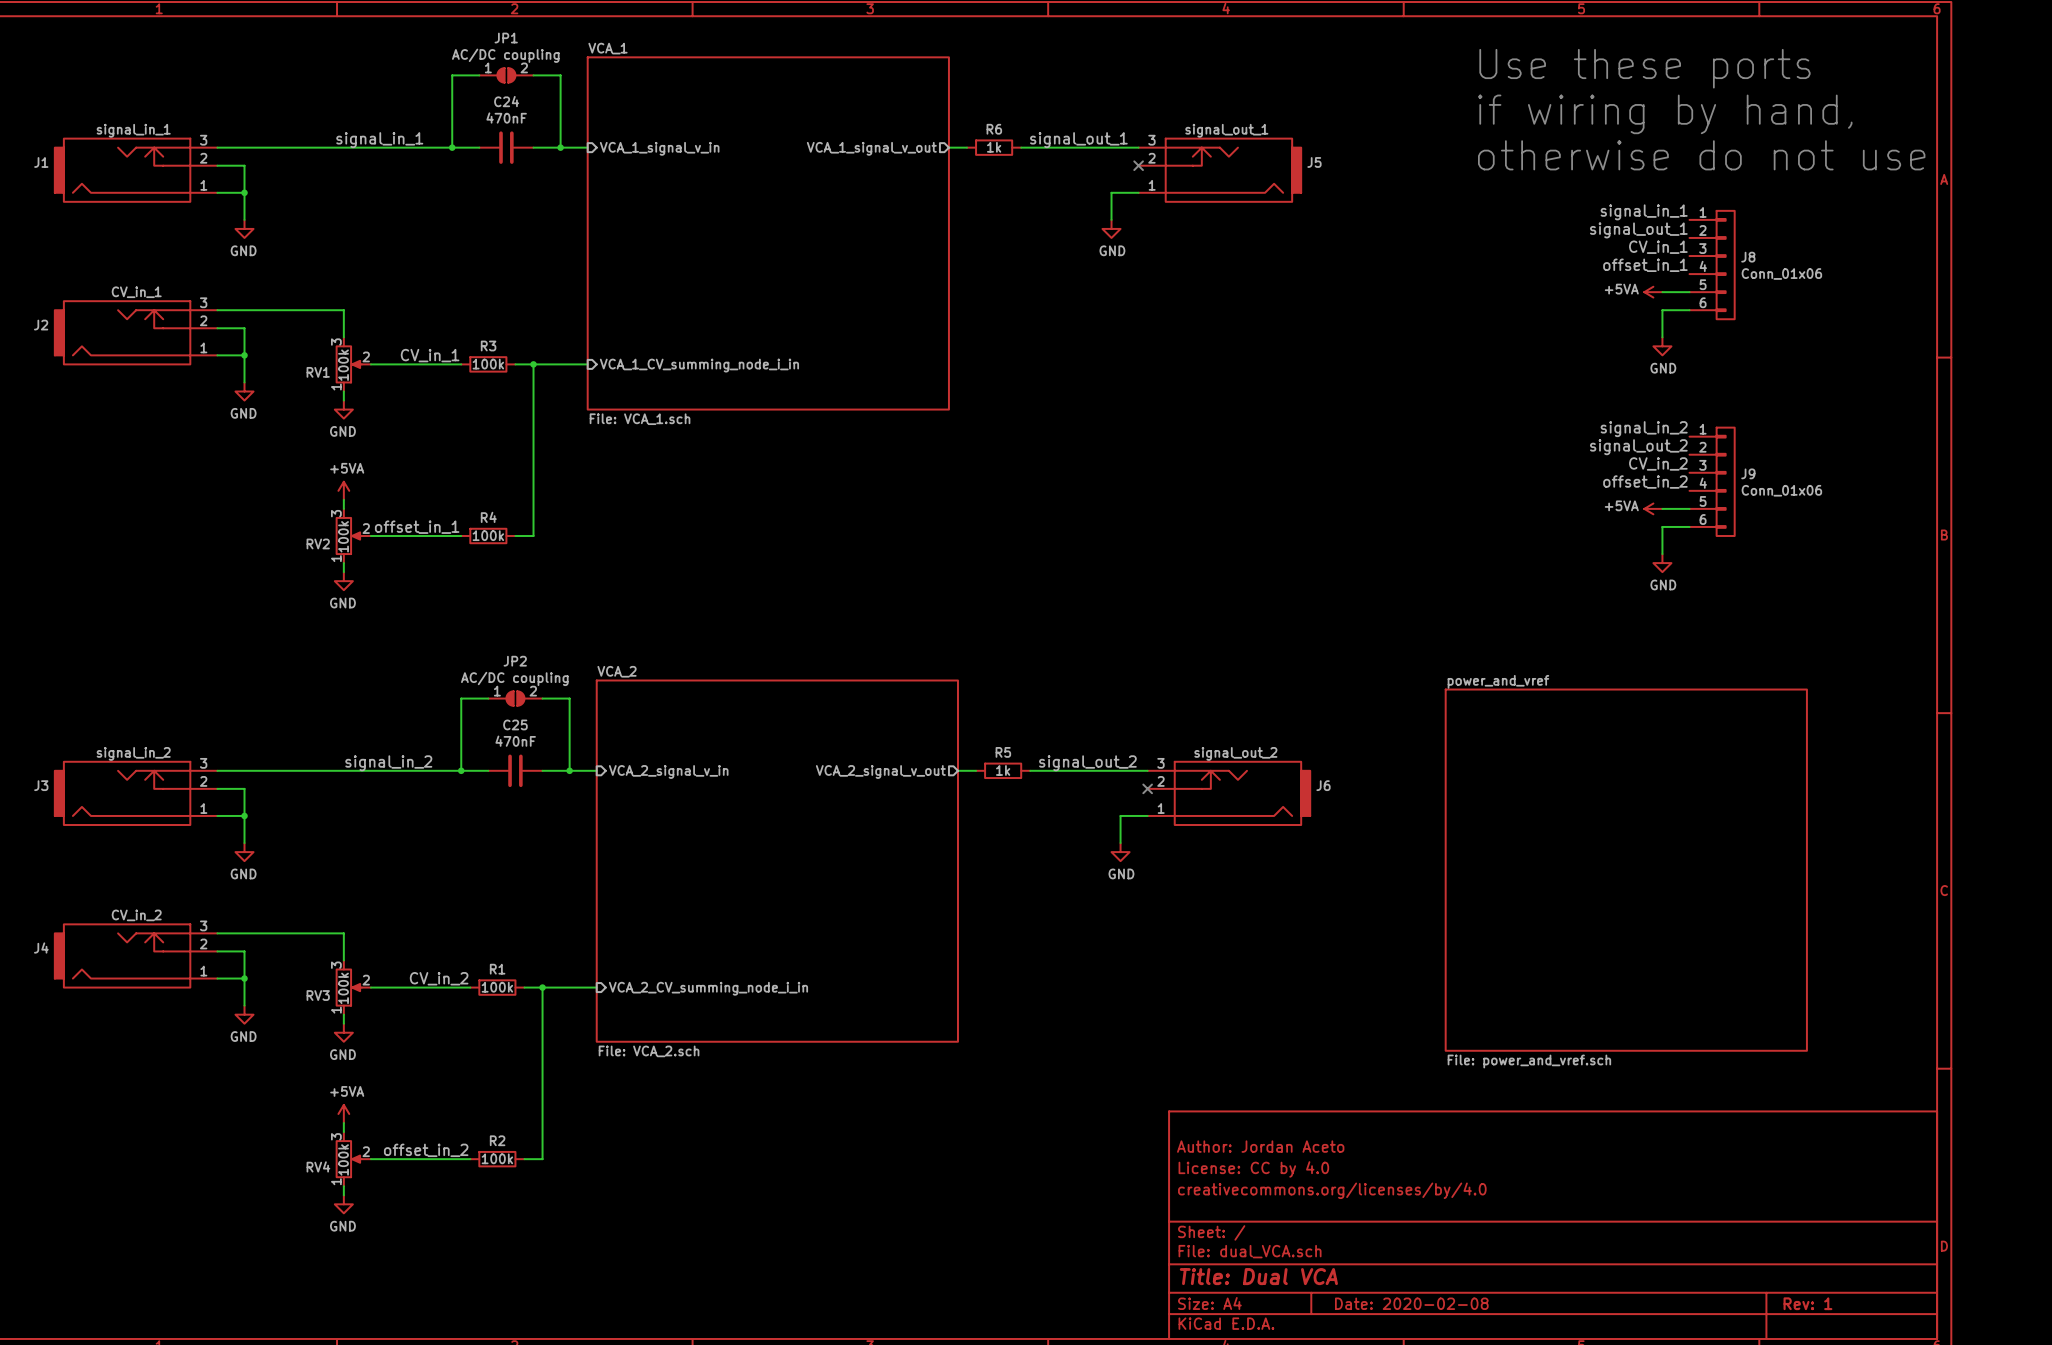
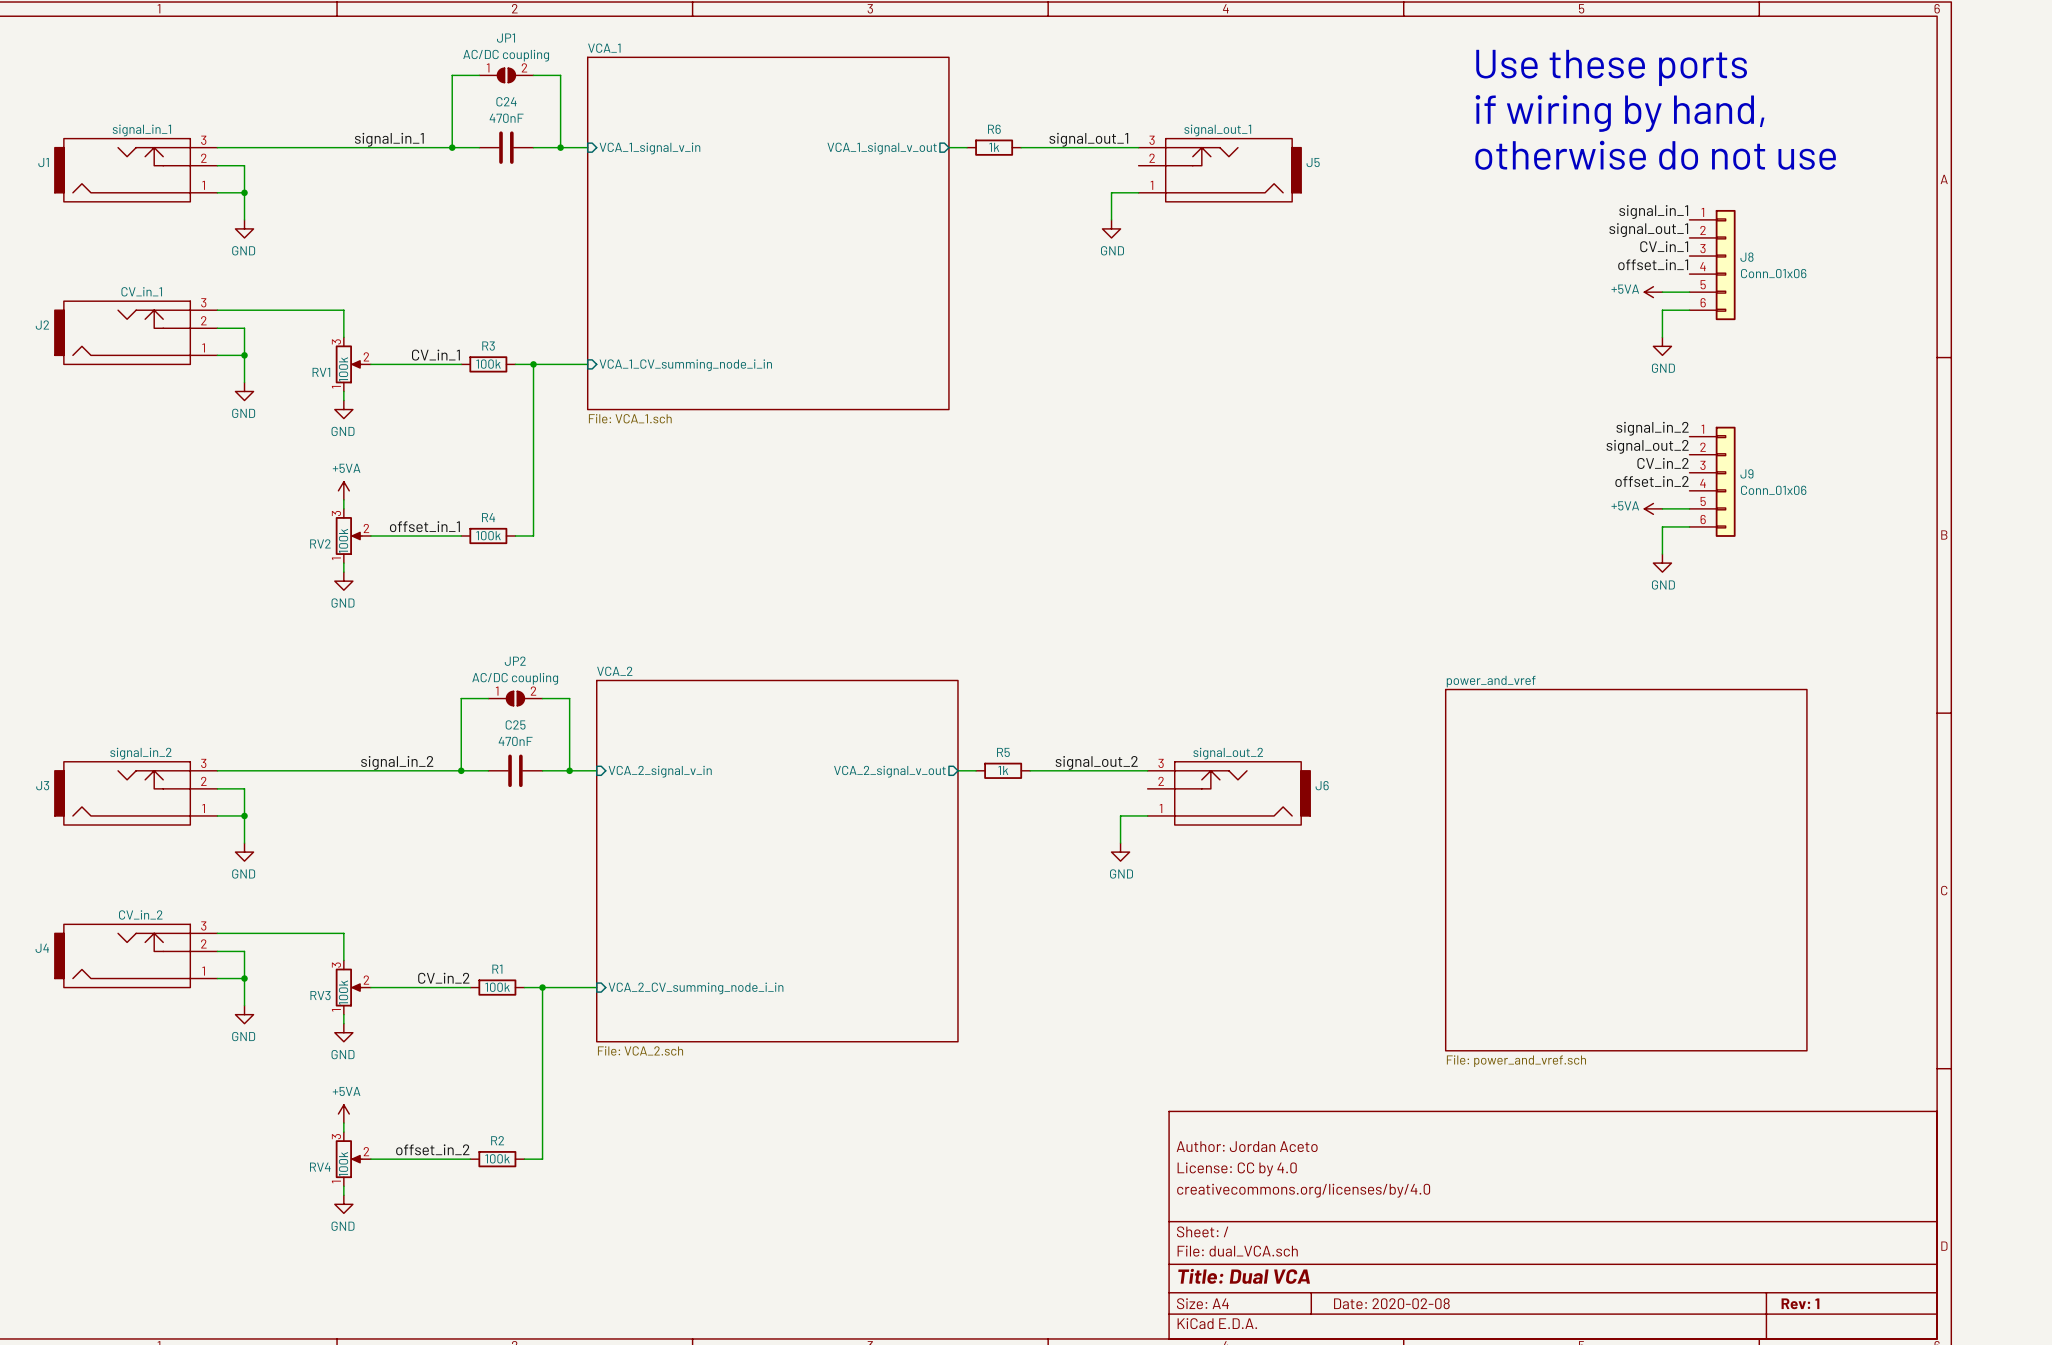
no-connect mark: (1138, 165) -> none
no-connect mark: (1147, 788) -> none

